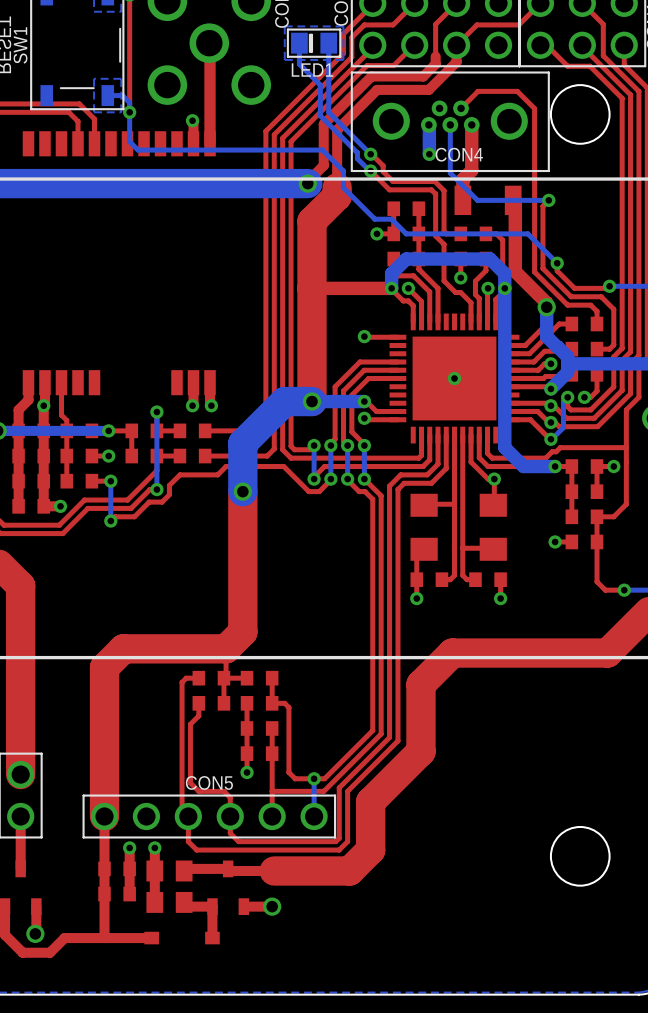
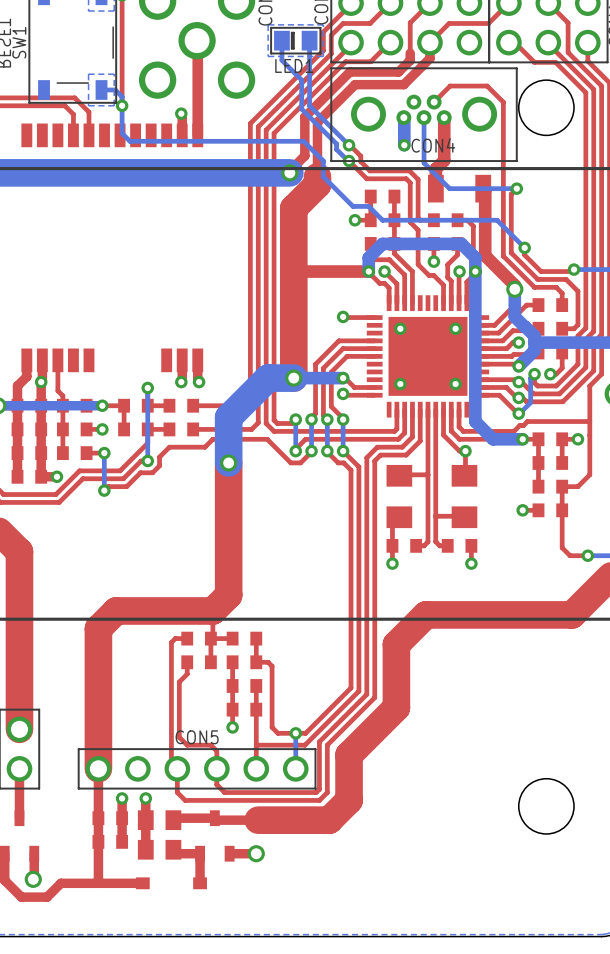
via: none -> (400, 328)
via: none -> (455, 328)
via: (454, 378) -> none
via: none -> (400, 384)
via: none -> (455, 384)

